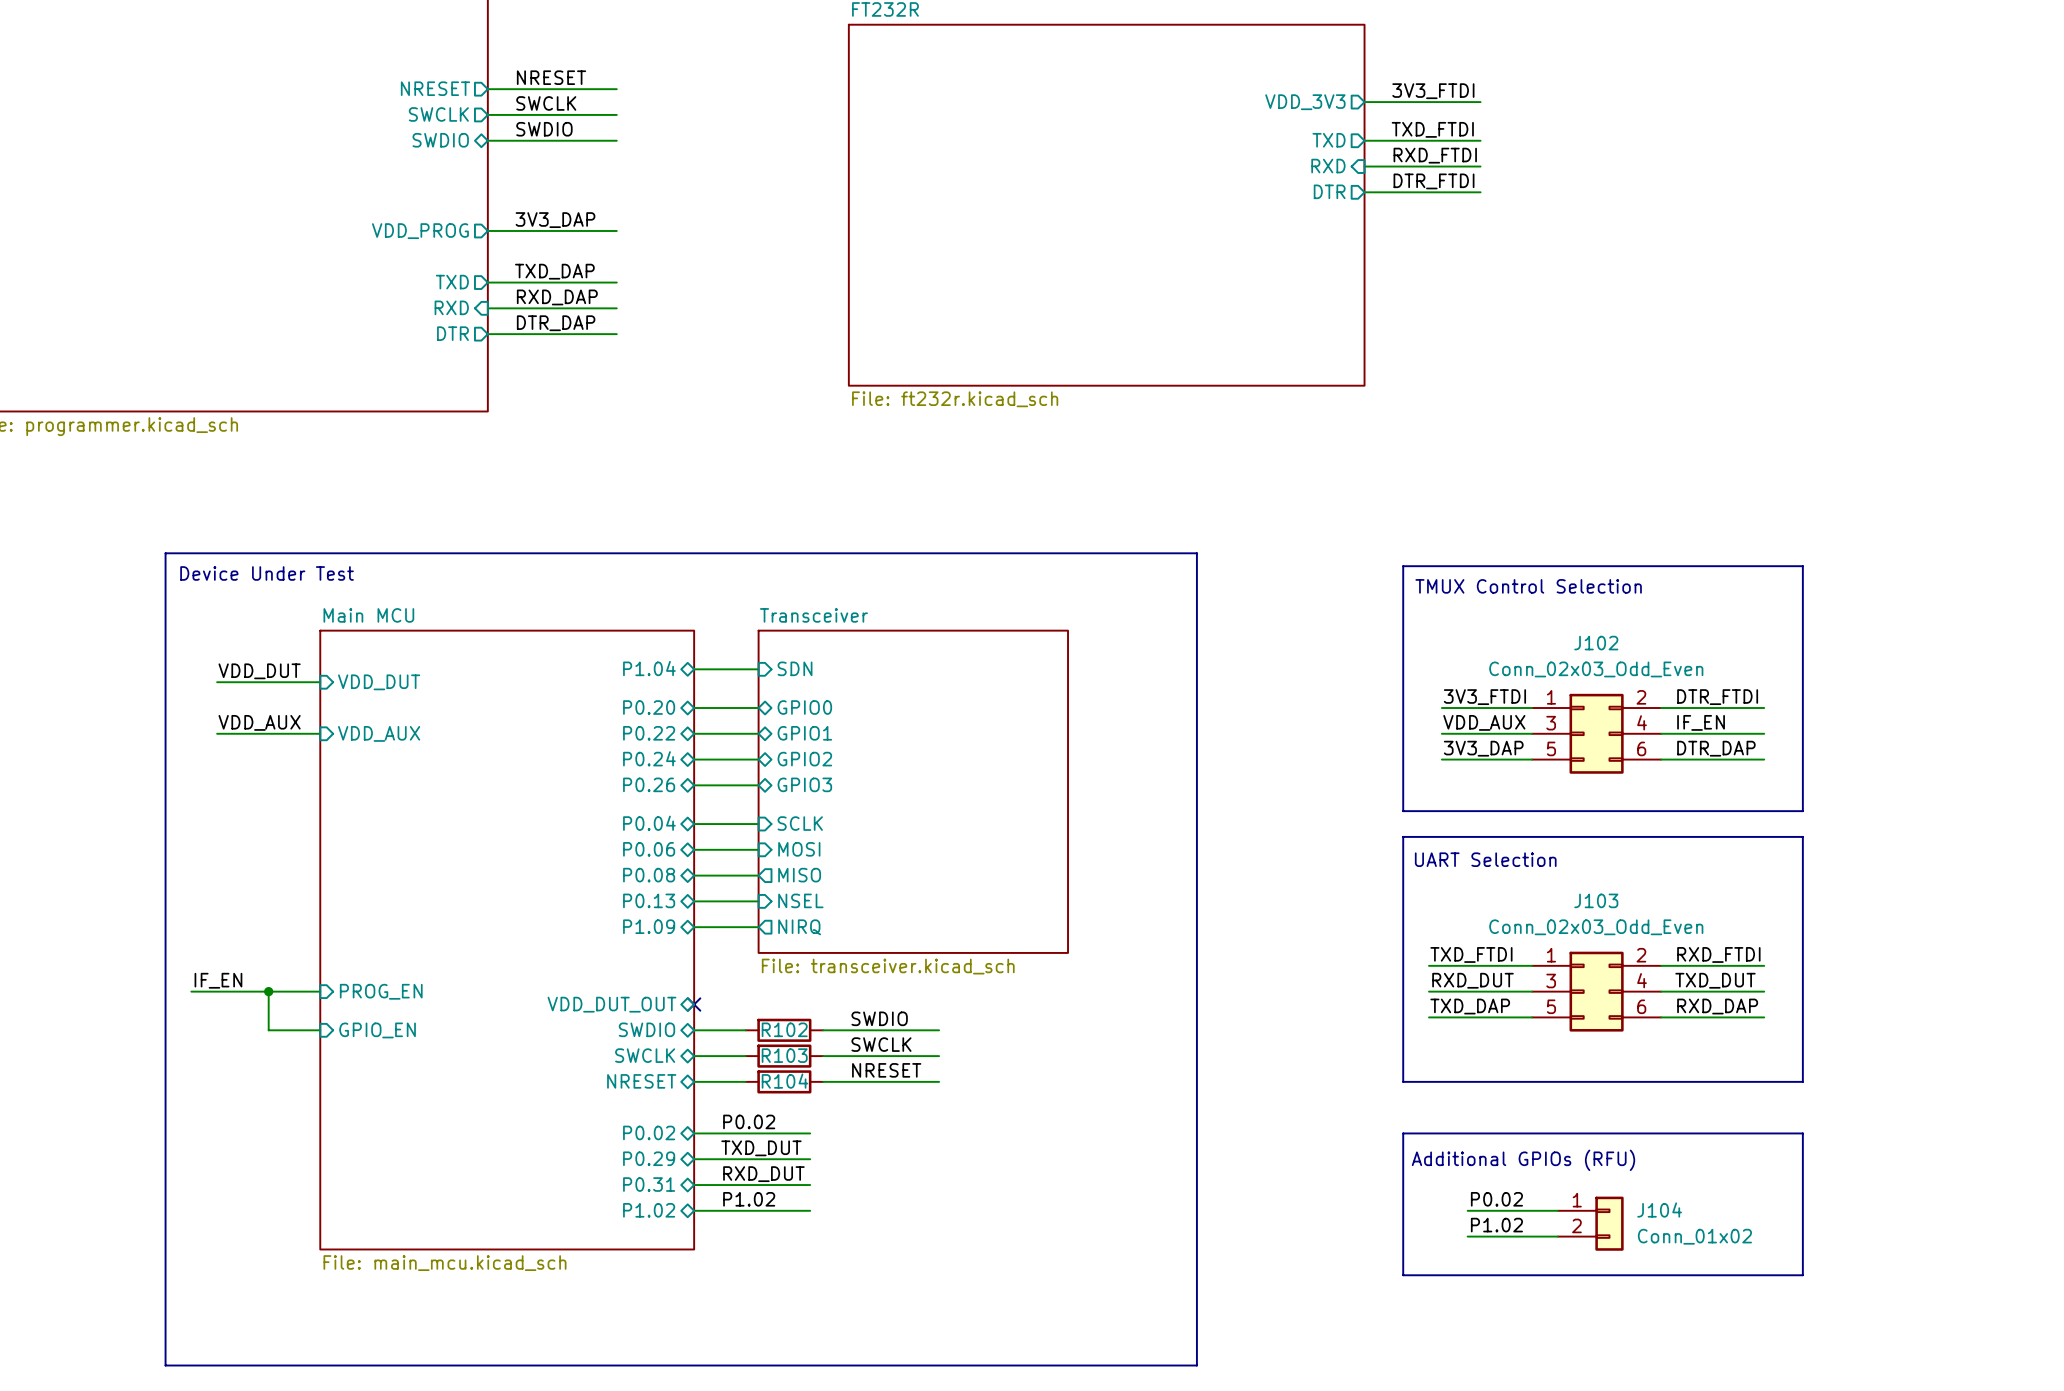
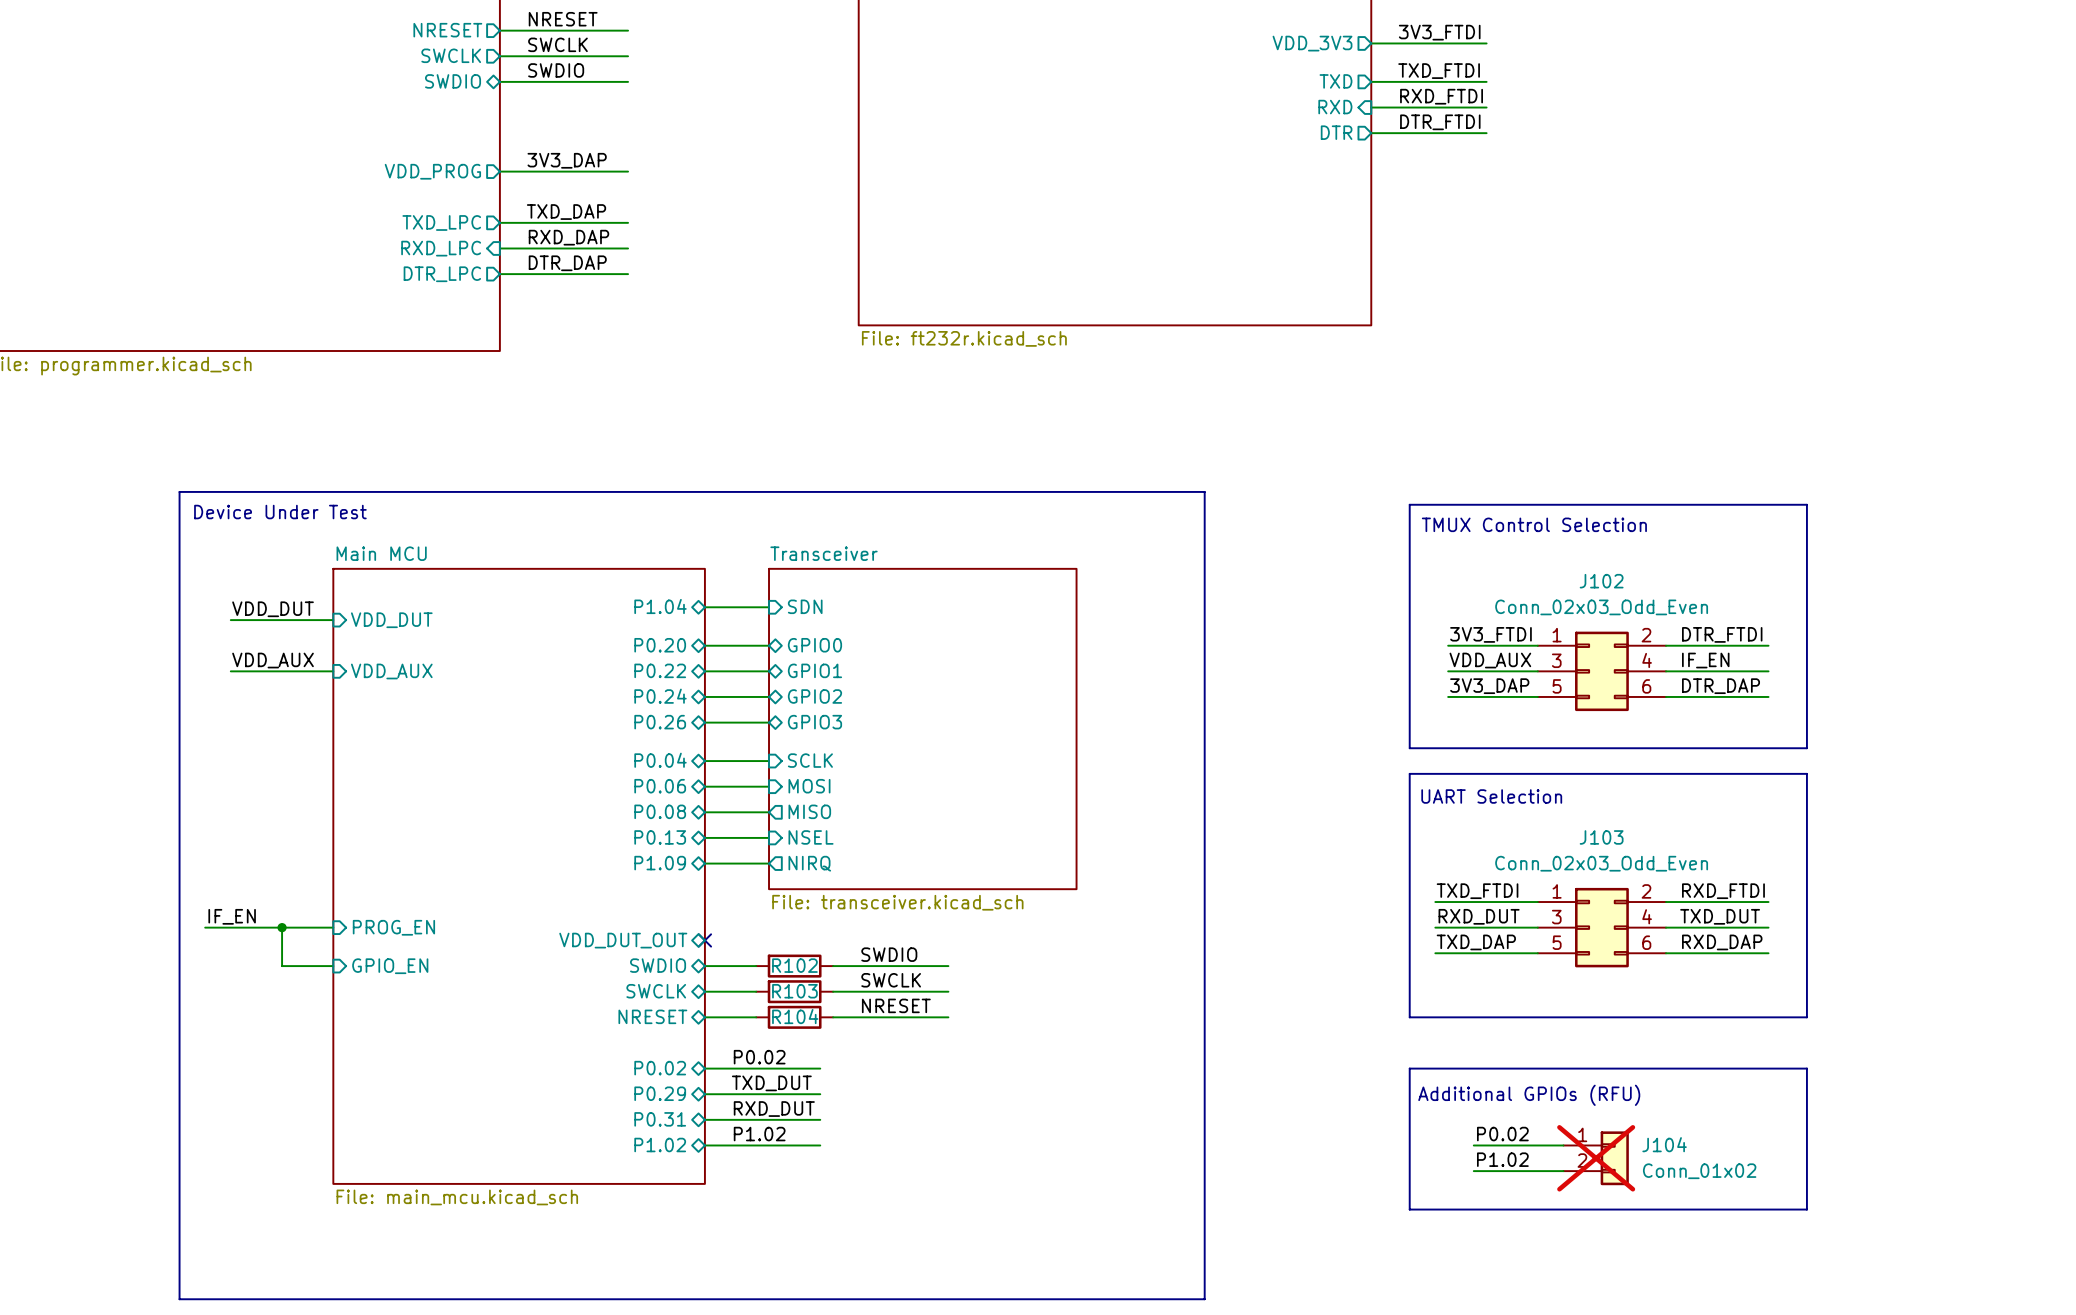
sheet pin: TXD (452, 282) -> TXD_LPC (441, 222)
sheet pin: RXD (451, 307) -> RXD_LPC (441, 248)
sheet pin: DTR (452, 333) -> DTR_LPC (442, 274)
J104 do-not-place cross: none -> (1596, 1158)

